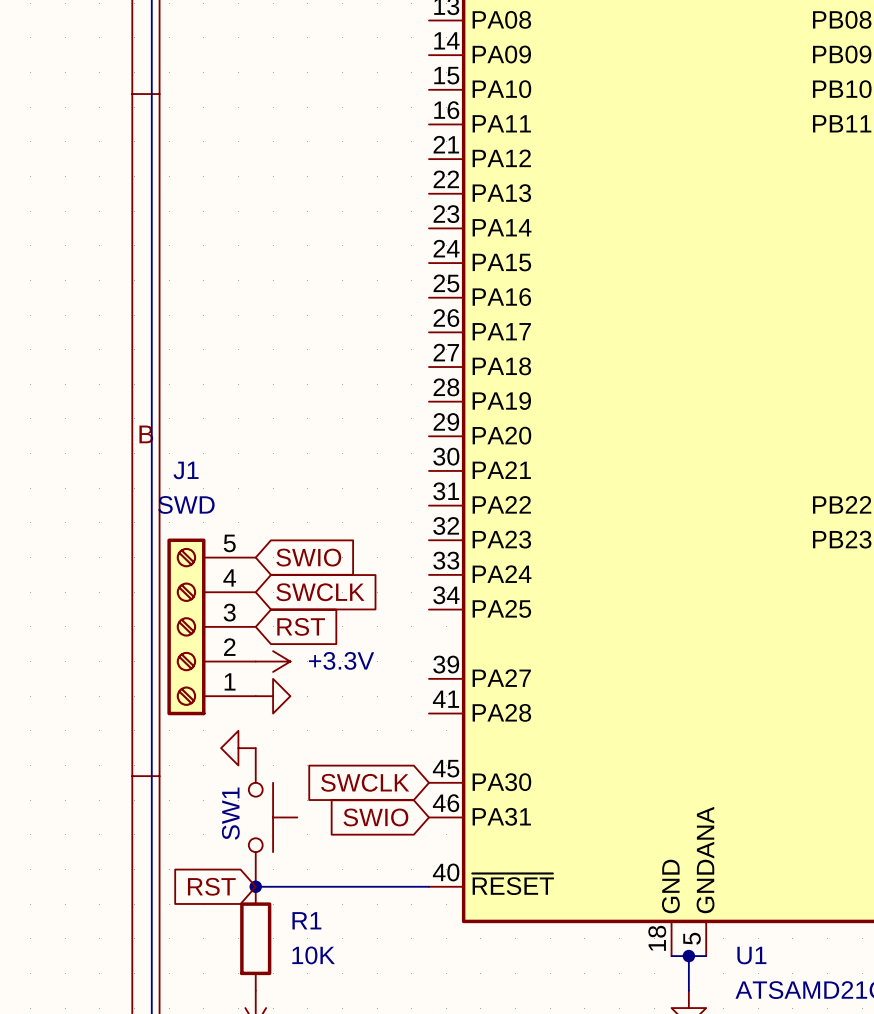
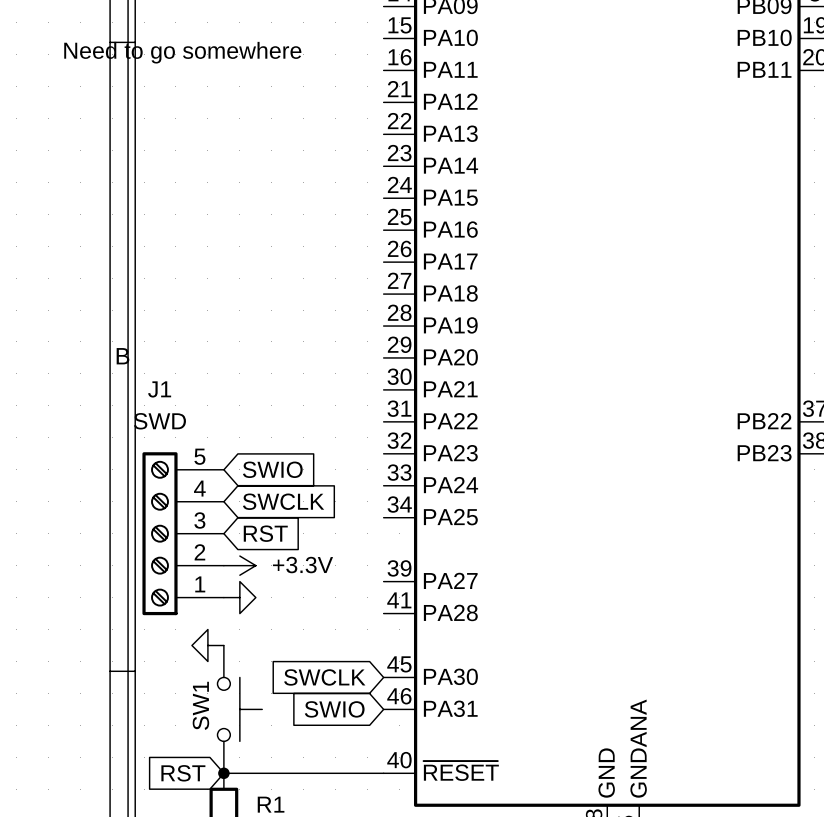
text: none -> Need to go somewhere (182, 52)

